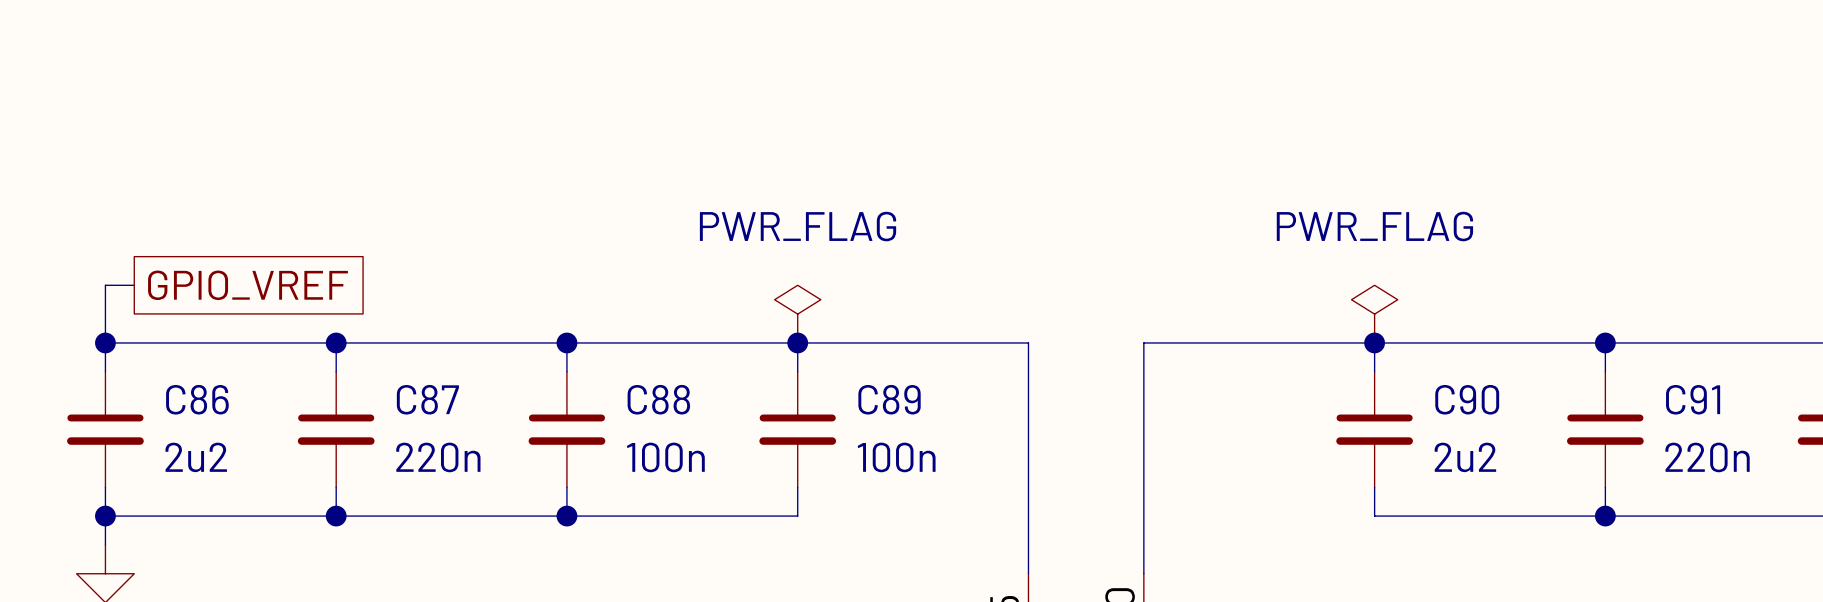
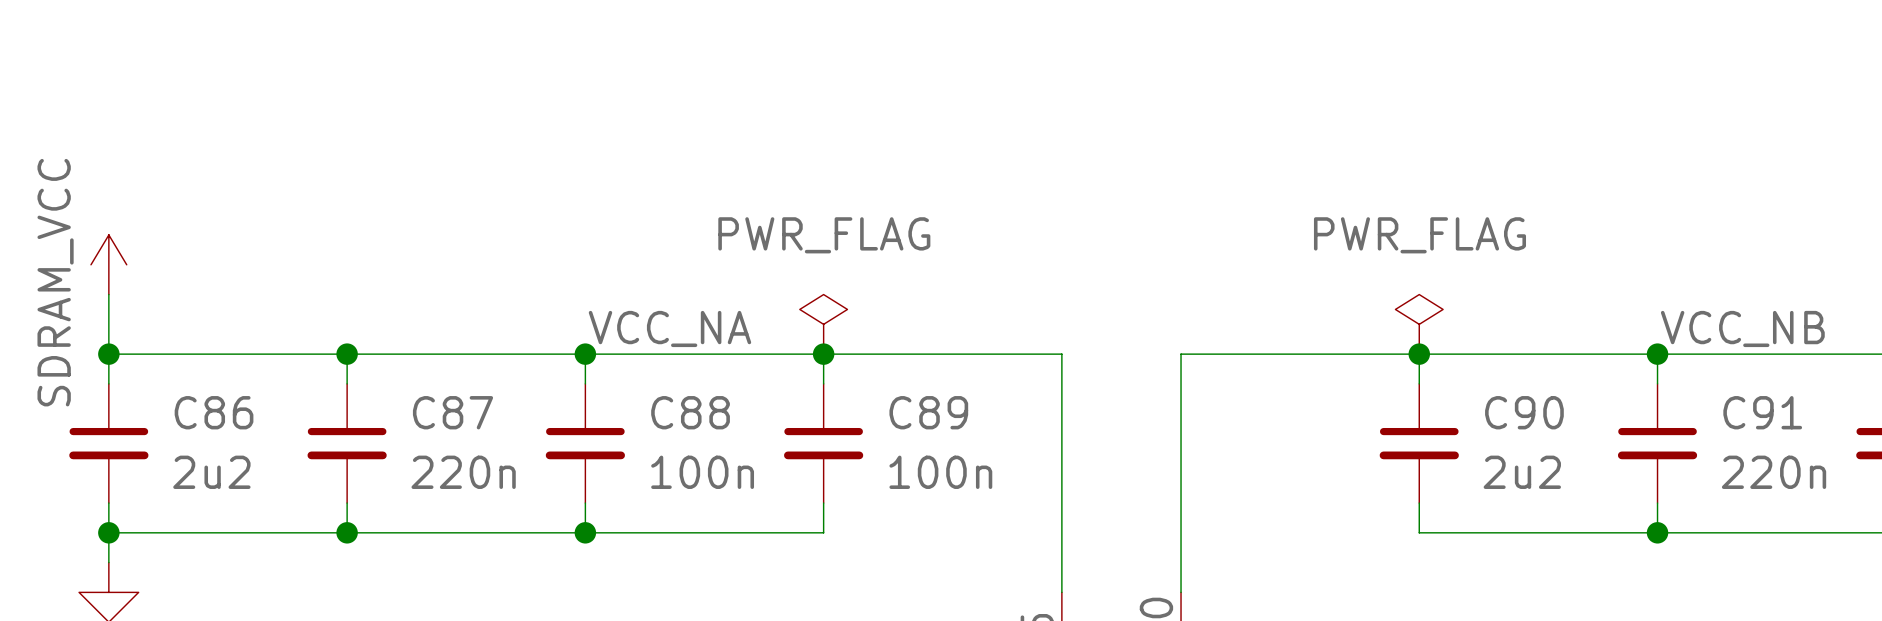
power symbol: none -> SDRAM_VCC (108, 264)
wire: (105, 285) (134, 285) -> none
global label: GPIO_VREF (247, 285) -> none
label: none -> VCC_NA (669, 328)
label: none -> VCC_NB (1742, 328)

